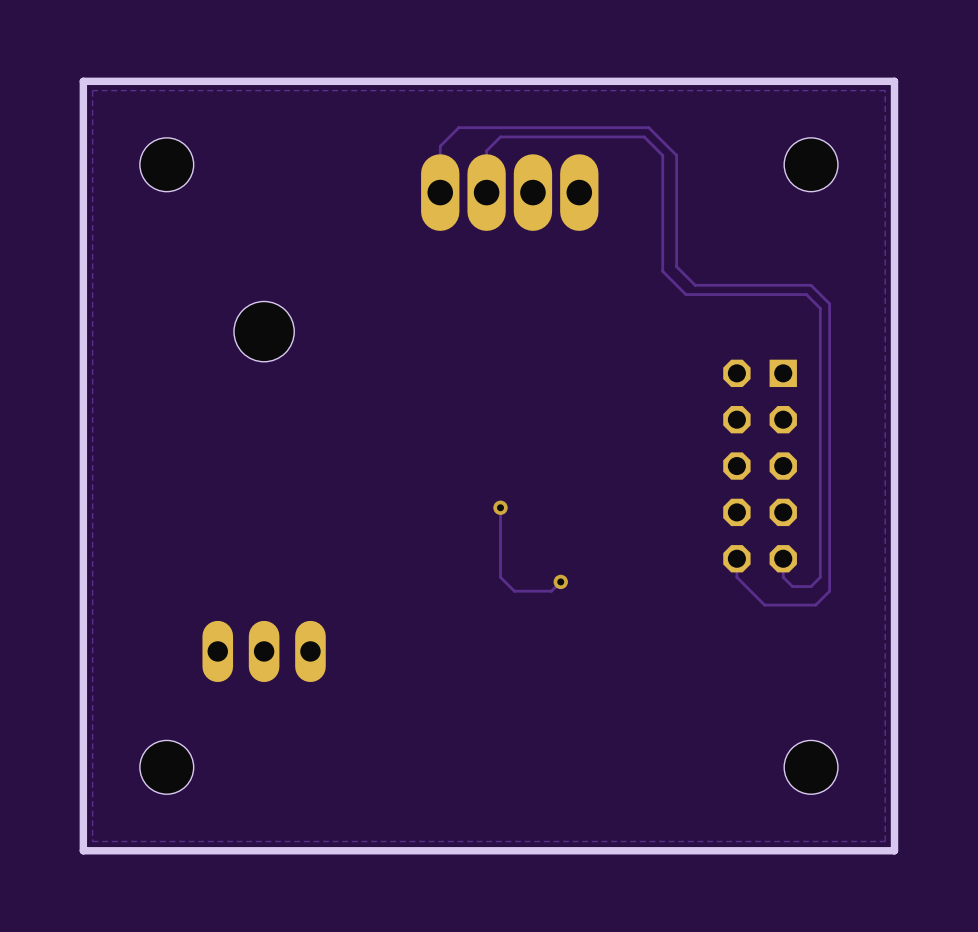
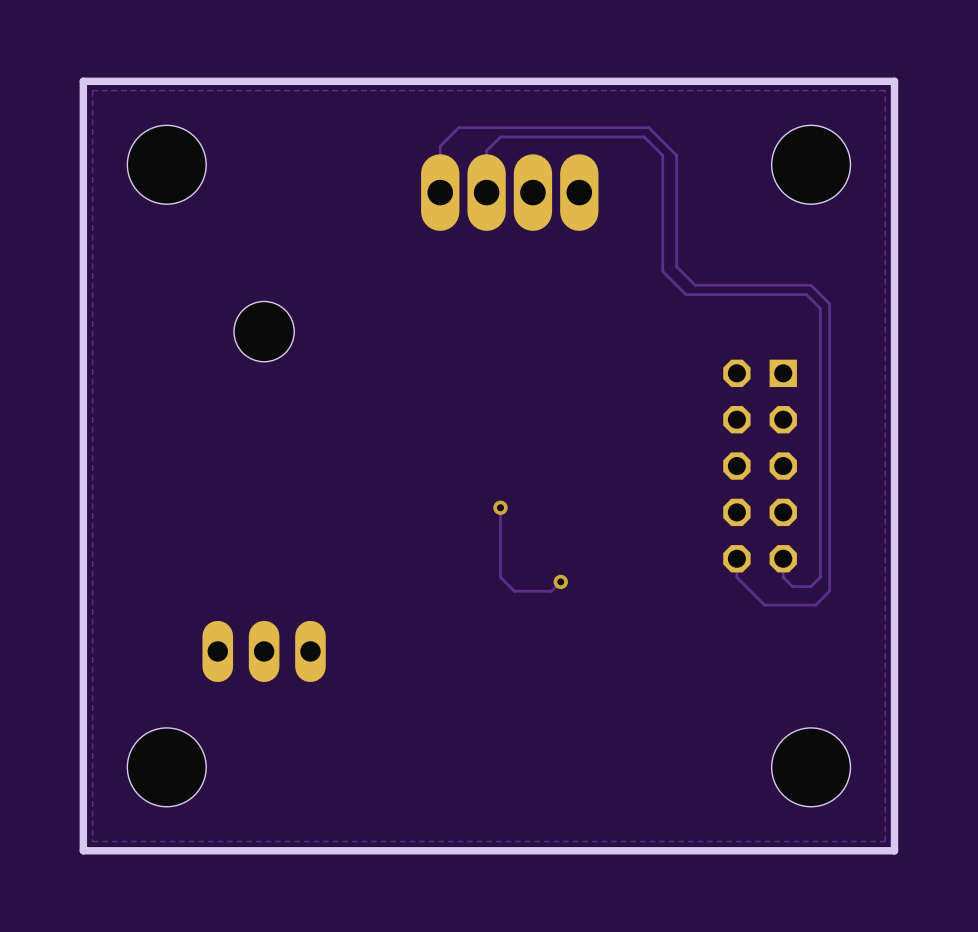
hole size: [139, 137, 194, 192] -> [127, 125, 207, 205]
hole size: [784, 137, 838, 192] -> [771, 125, 851, 205]
hole size: [139, 740, 194, 795] -> [127, 727, 207, 807]
hole size: [784, 740, 838, 795] -> [771, 727, 851, 807]

